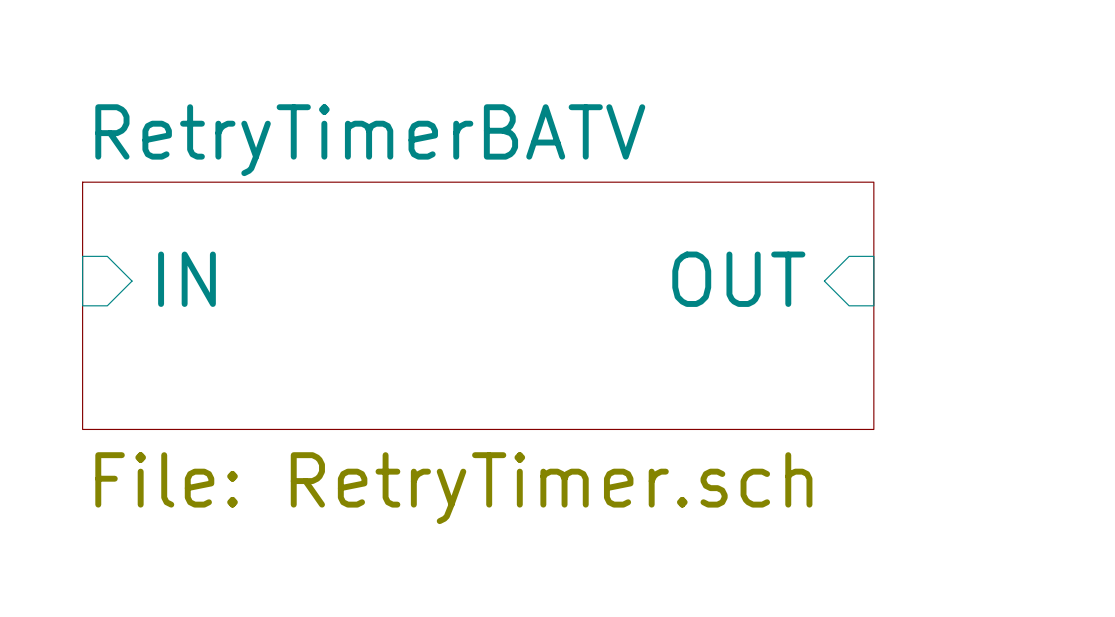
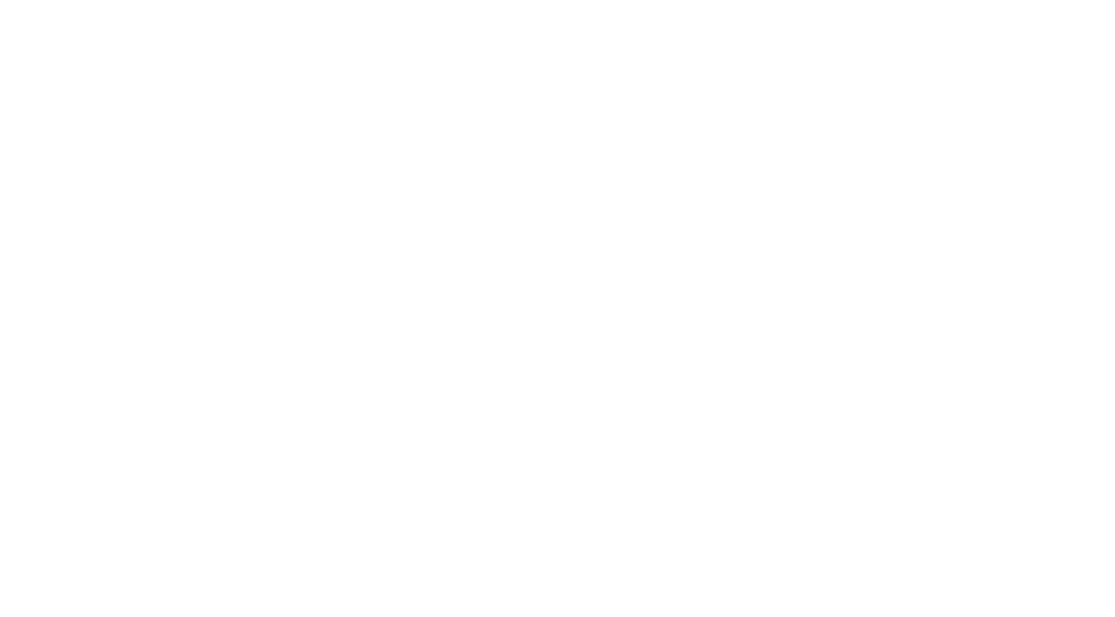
sheet pin: IN (186, 279) -> none
sheet pin: OUT (738, 279) -> none
sheet RetryTimerBATV: File: RetryTimer.sch (478, 305) -> none

